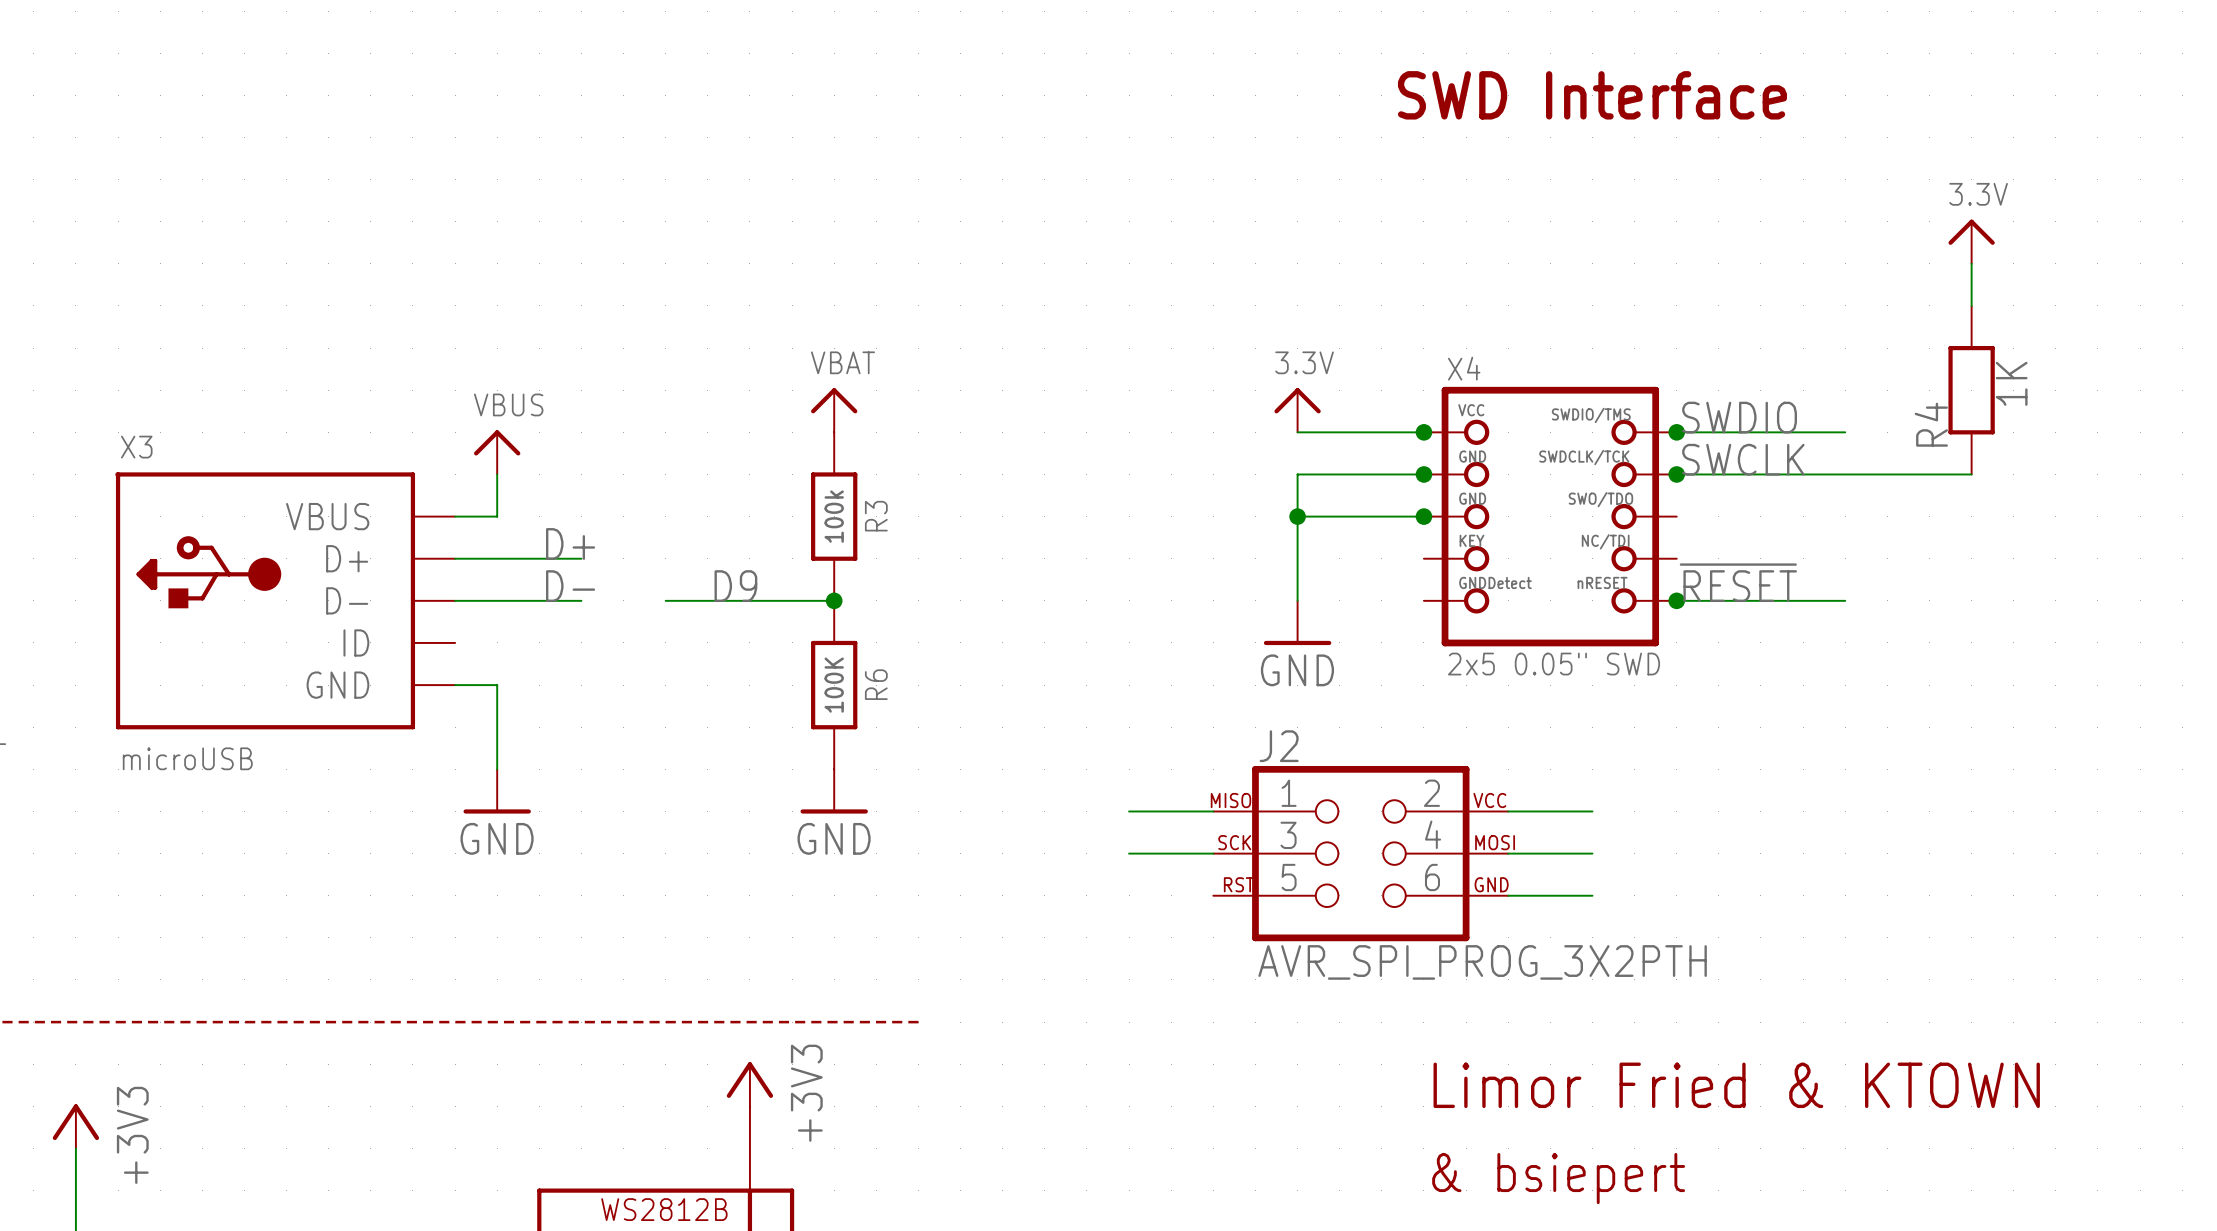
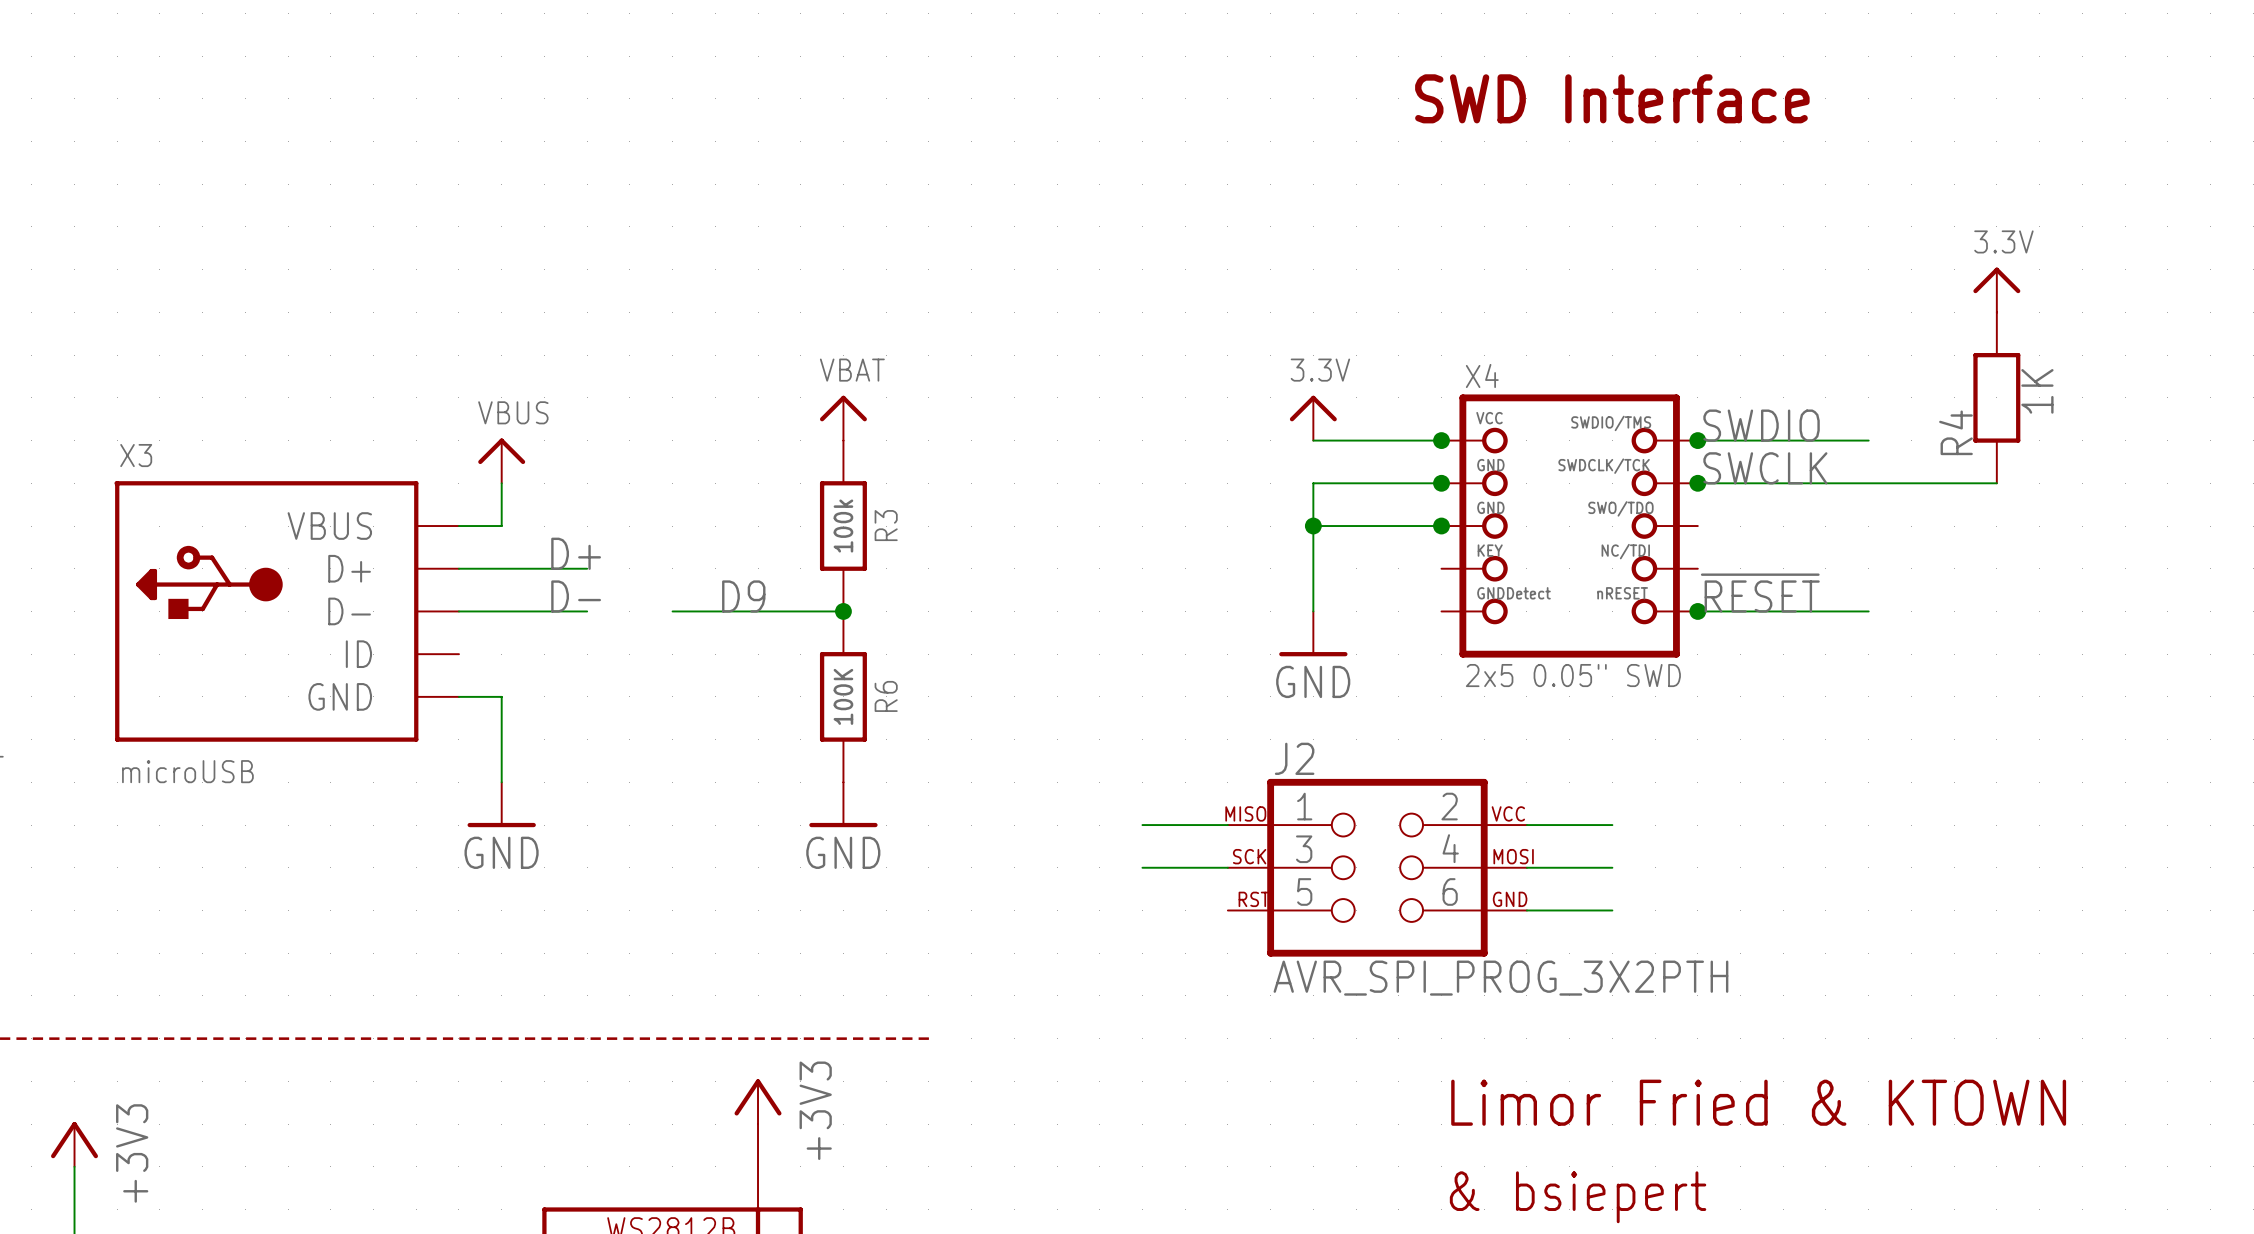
power symbol position: 3.3V (1971, 241) -> 3.3V (1996, 289)

